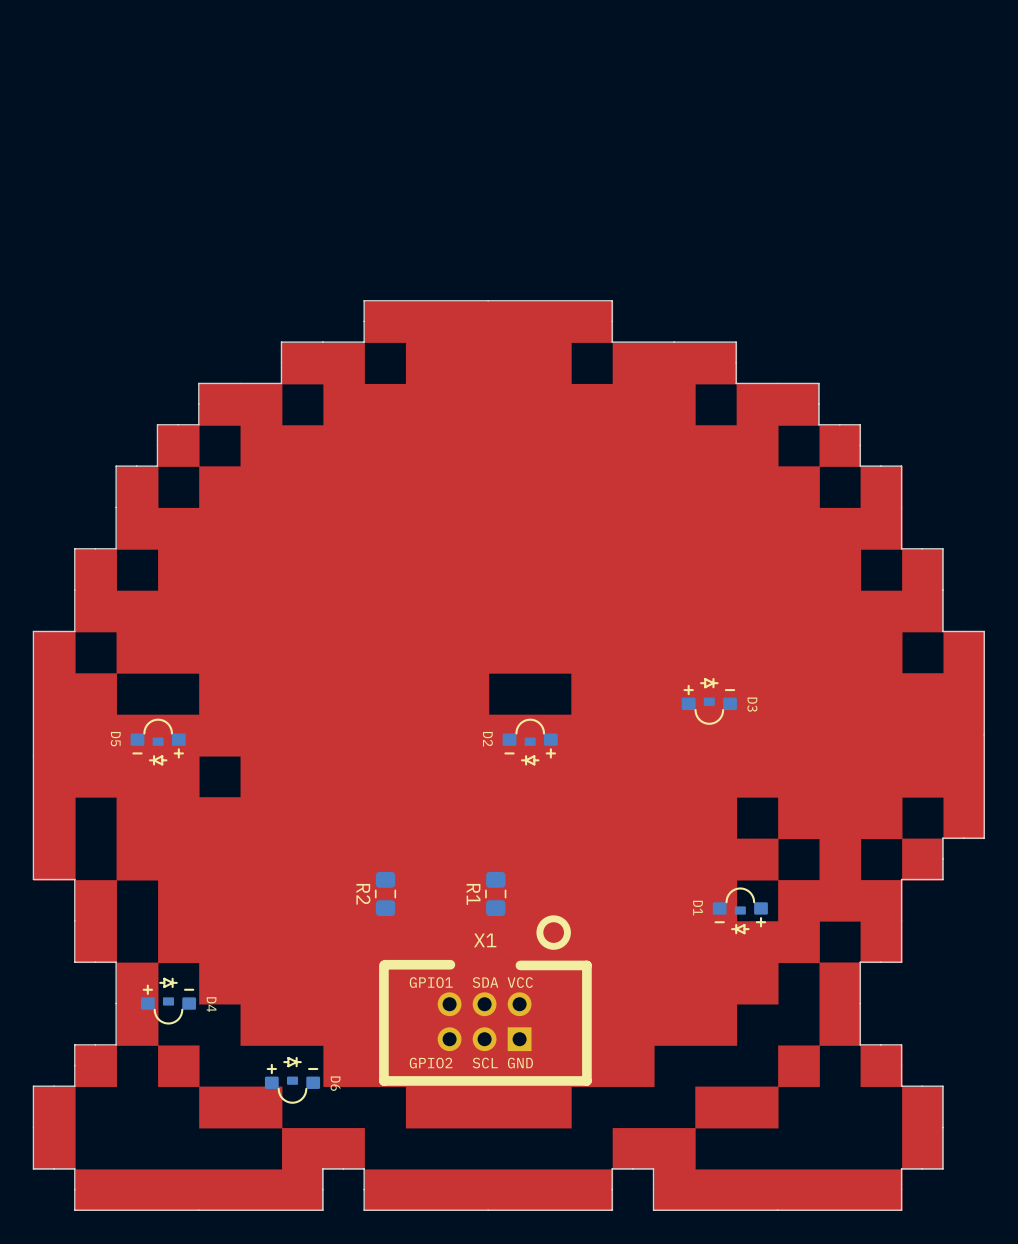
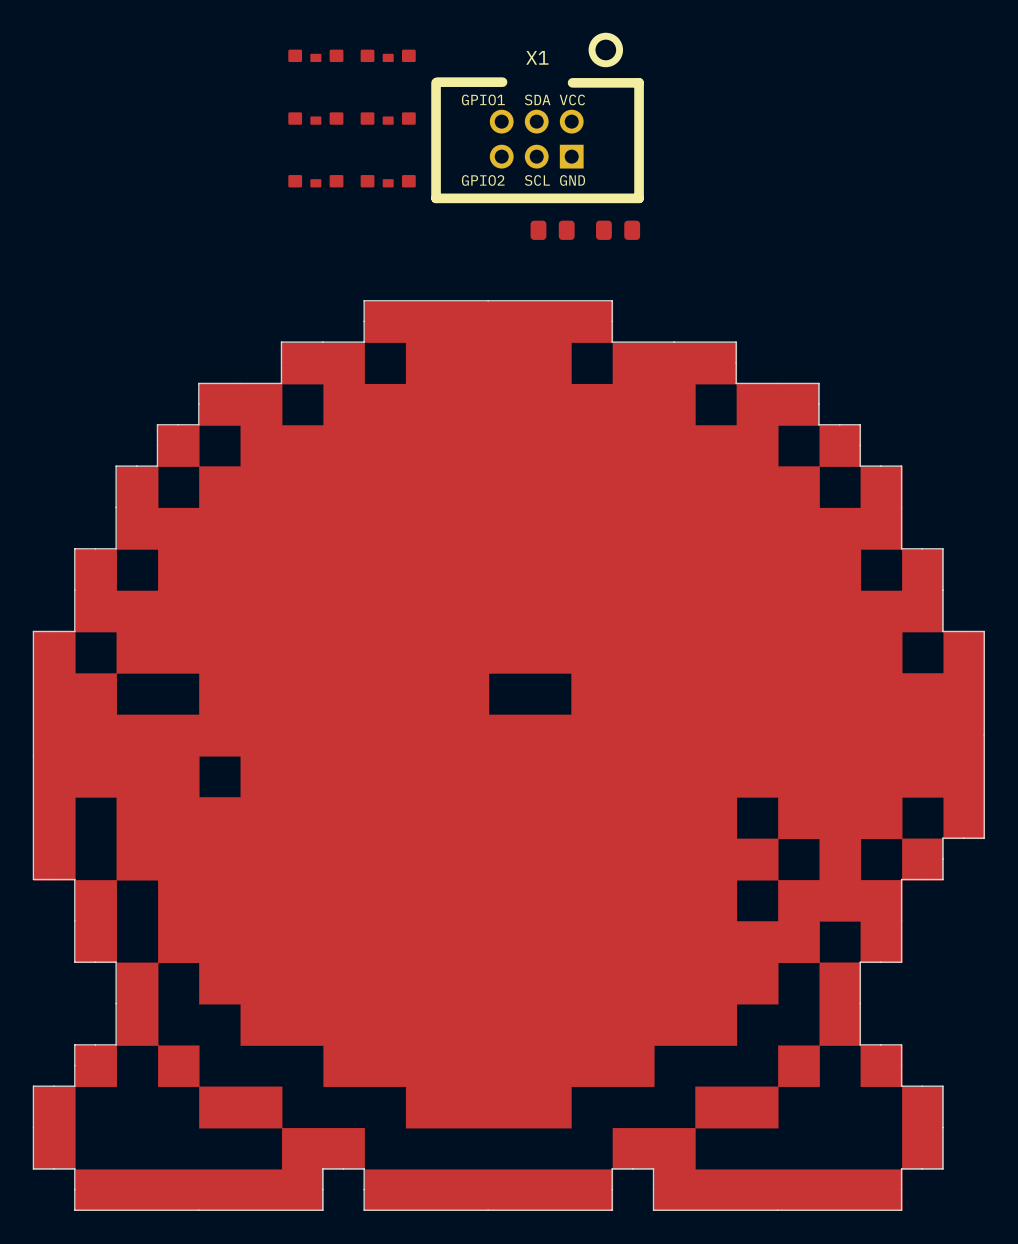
part: none -> (315, 55)
part: none -> (388, 55)
part: none -> (315, 118)
part: none -> (388, 118)
part: none -> (315, 181)
part: none -> (388, 181)
part: none -> (552, 230)
part: none -> (618, 230)
D3: (709, 701) -> none
D5: (158, 742) -> none
D2: (530, 742) -> none
R2: (385, 893) -> none
R1: (495, 893) -> none
D1: (740, 910) -> none
X1 position: (485, 1000) -> (537, 117)
D4: (168, 1001) -> none
D6: (292, 1080) -> none

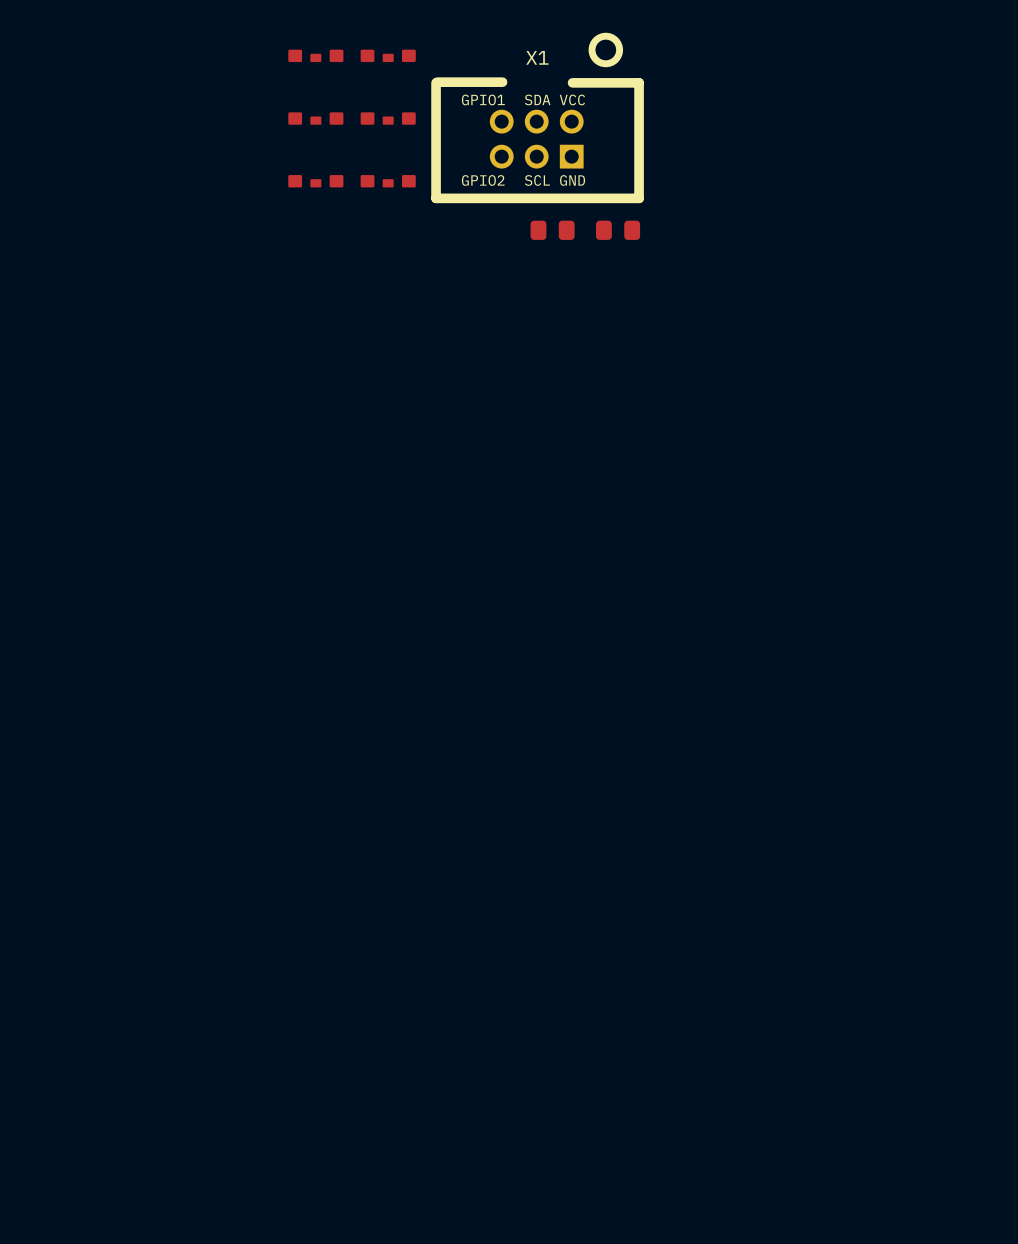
board edge: (612, 300) (612, 342) (736, 342) (736, 383) (818, 383) (818, 424) (860, 424) (860, 466) (901, 466) (901, 548) (942, 548) (942, 631) (984, 631) (984, 838) (942, 838) (942, 879) (901, 879) (901, 962) (860, 962) (860, 1044) (901, 1044) (901, 1086) (942, 1086) (942, 1168) (901, 1168) (901, 1210) (653, 1210) (653, 1168) (612, 1168) (612, 1210) (364, 1210) (364, 1168) (322, 1168) (322, 1210) (74, 1210) (74, 1168) (33, 1168) (33, 1086) (74, 1086) (74, 1044) (116, 1044) (116, 962) (74, 962) (74, 879) (33, 879) (33, 631) (74, 631) (74, 548) (116, 548) (116, 466) (157, 466) (157, 424) (198, 424) (198, 383) (281, 383) (281, 342) (364, 342) (364, 300) (612, 300) -> none
drawing: [34, 301, 986, 1211] -> none

